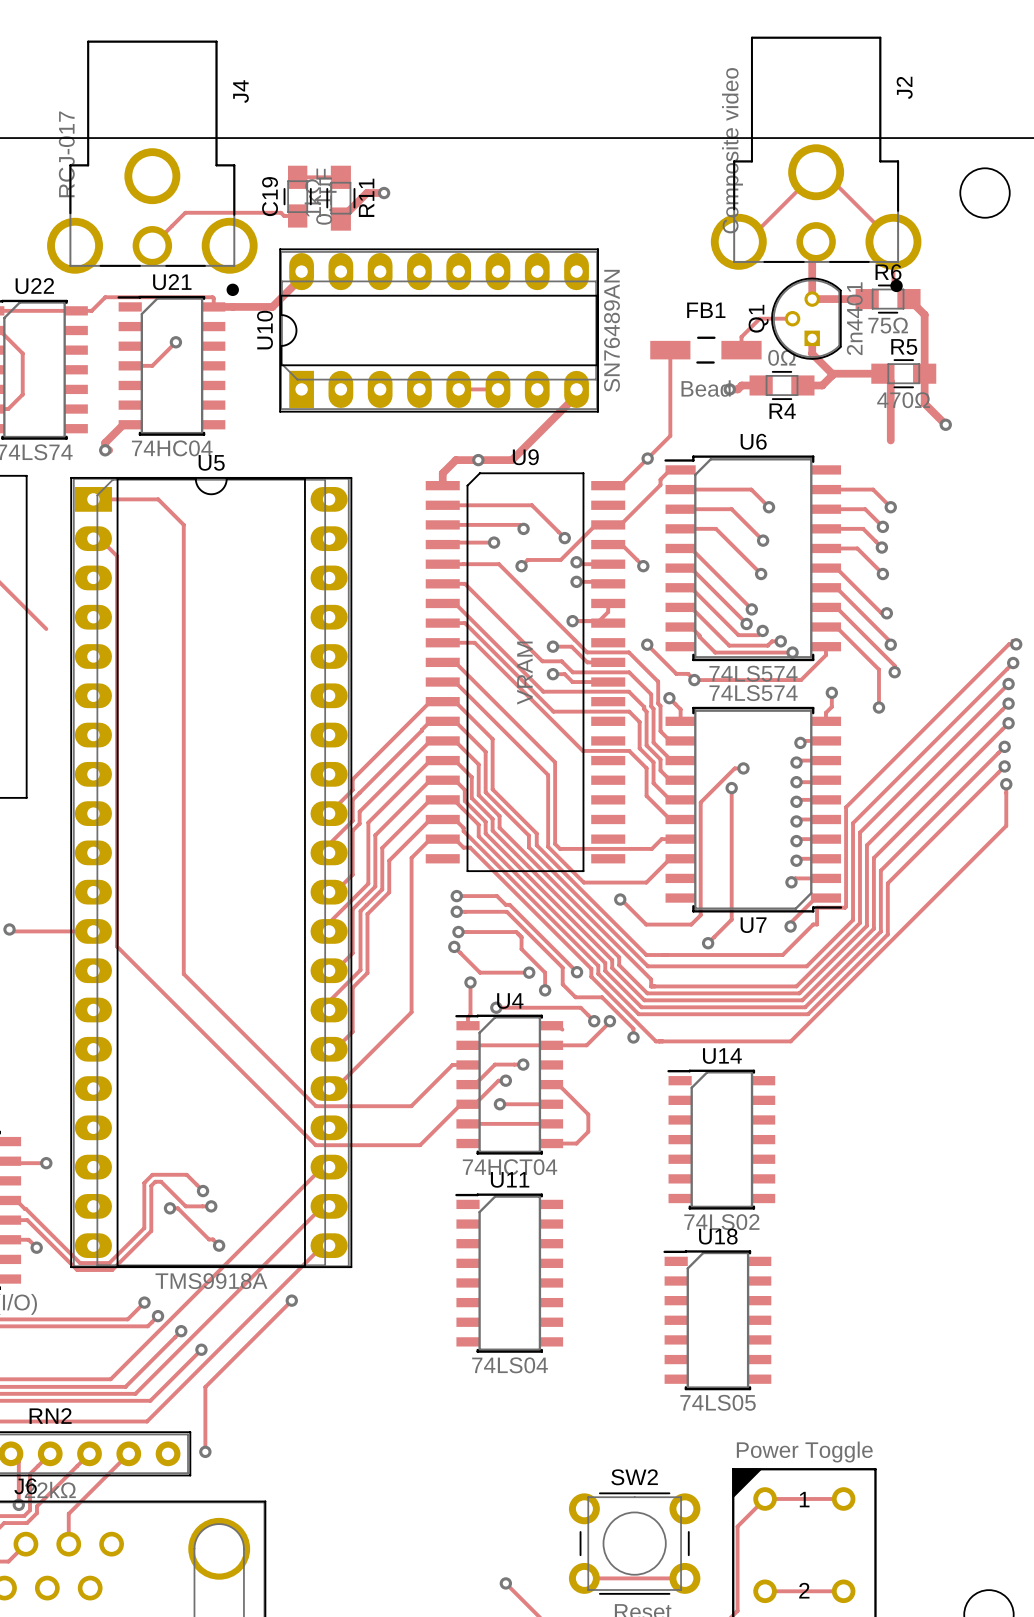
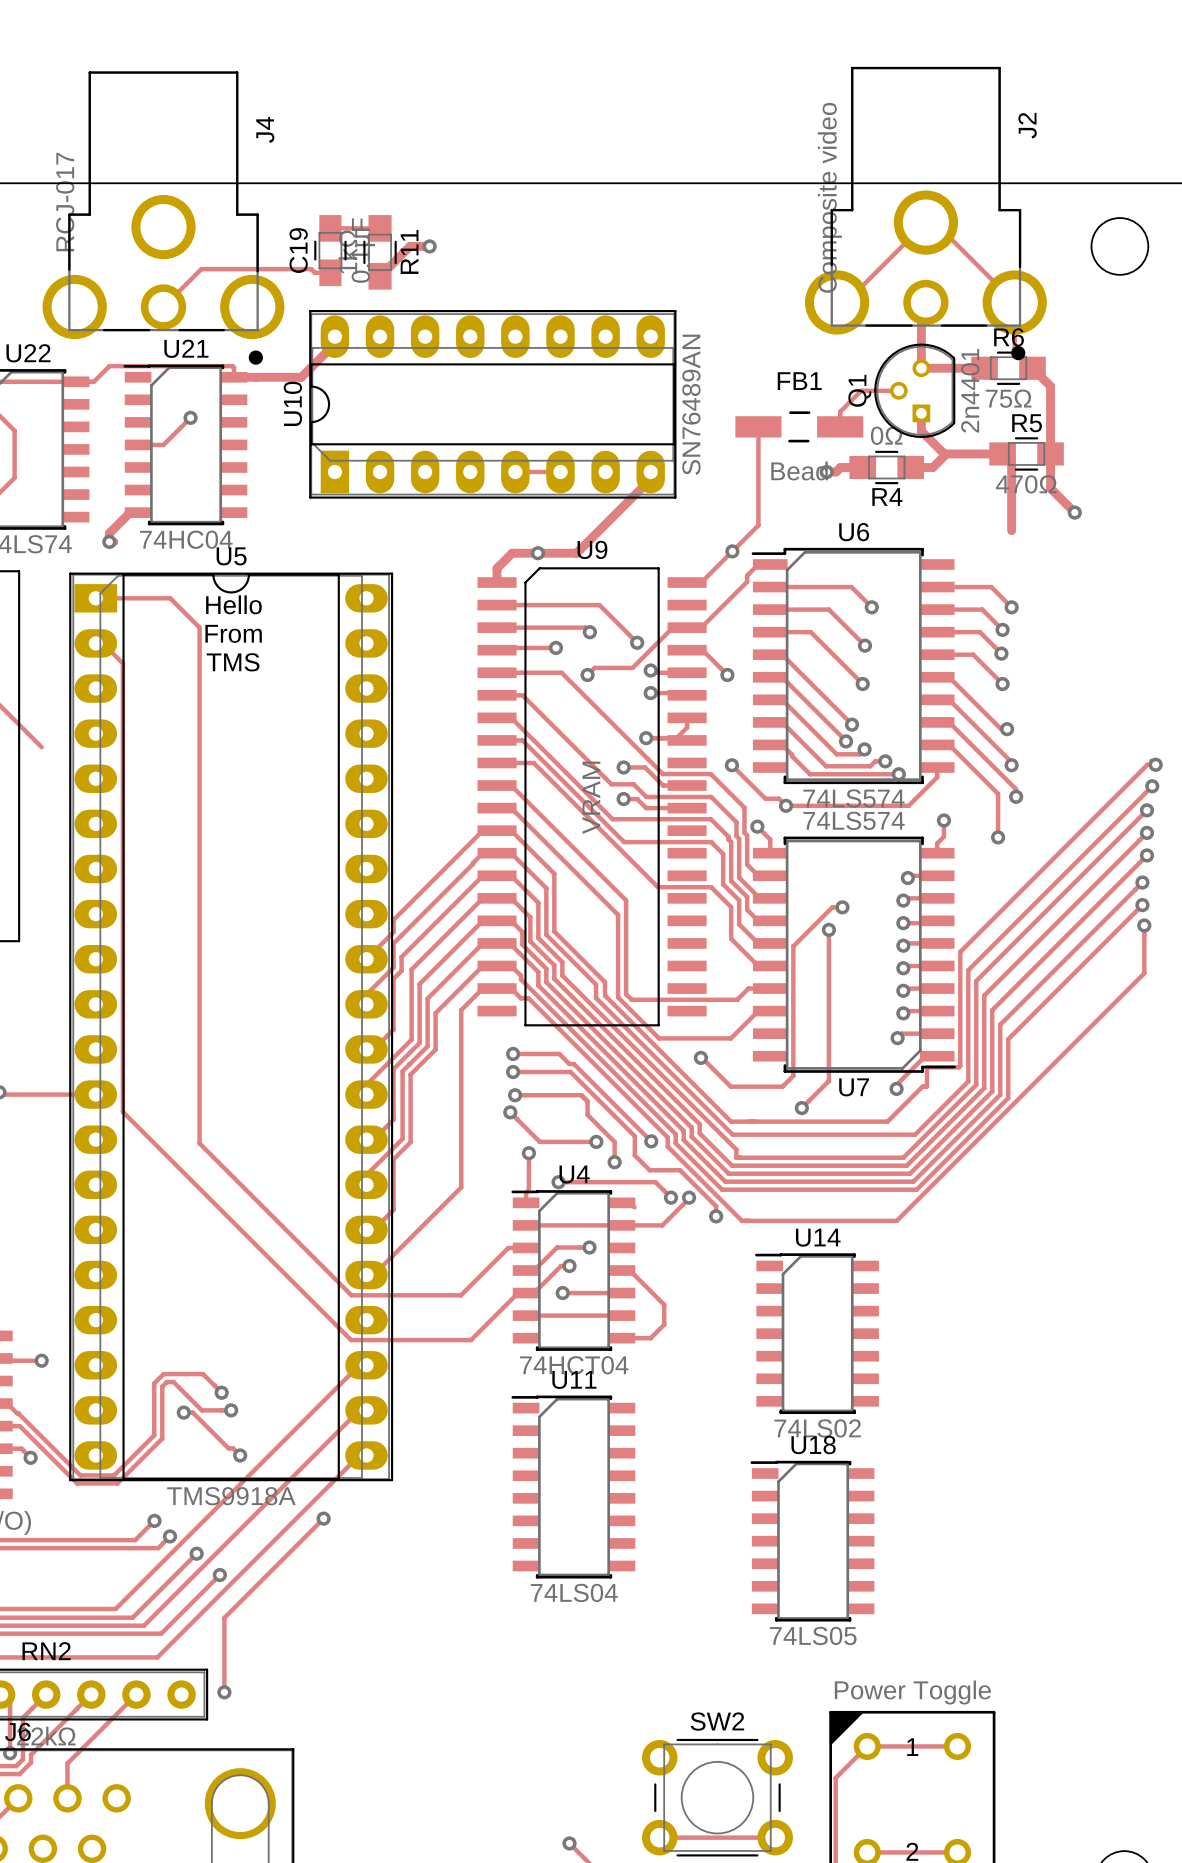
text: none -> Hello (233, 604)
text: none -> From (233, 633)
text: none -> TMS (233, 662)

